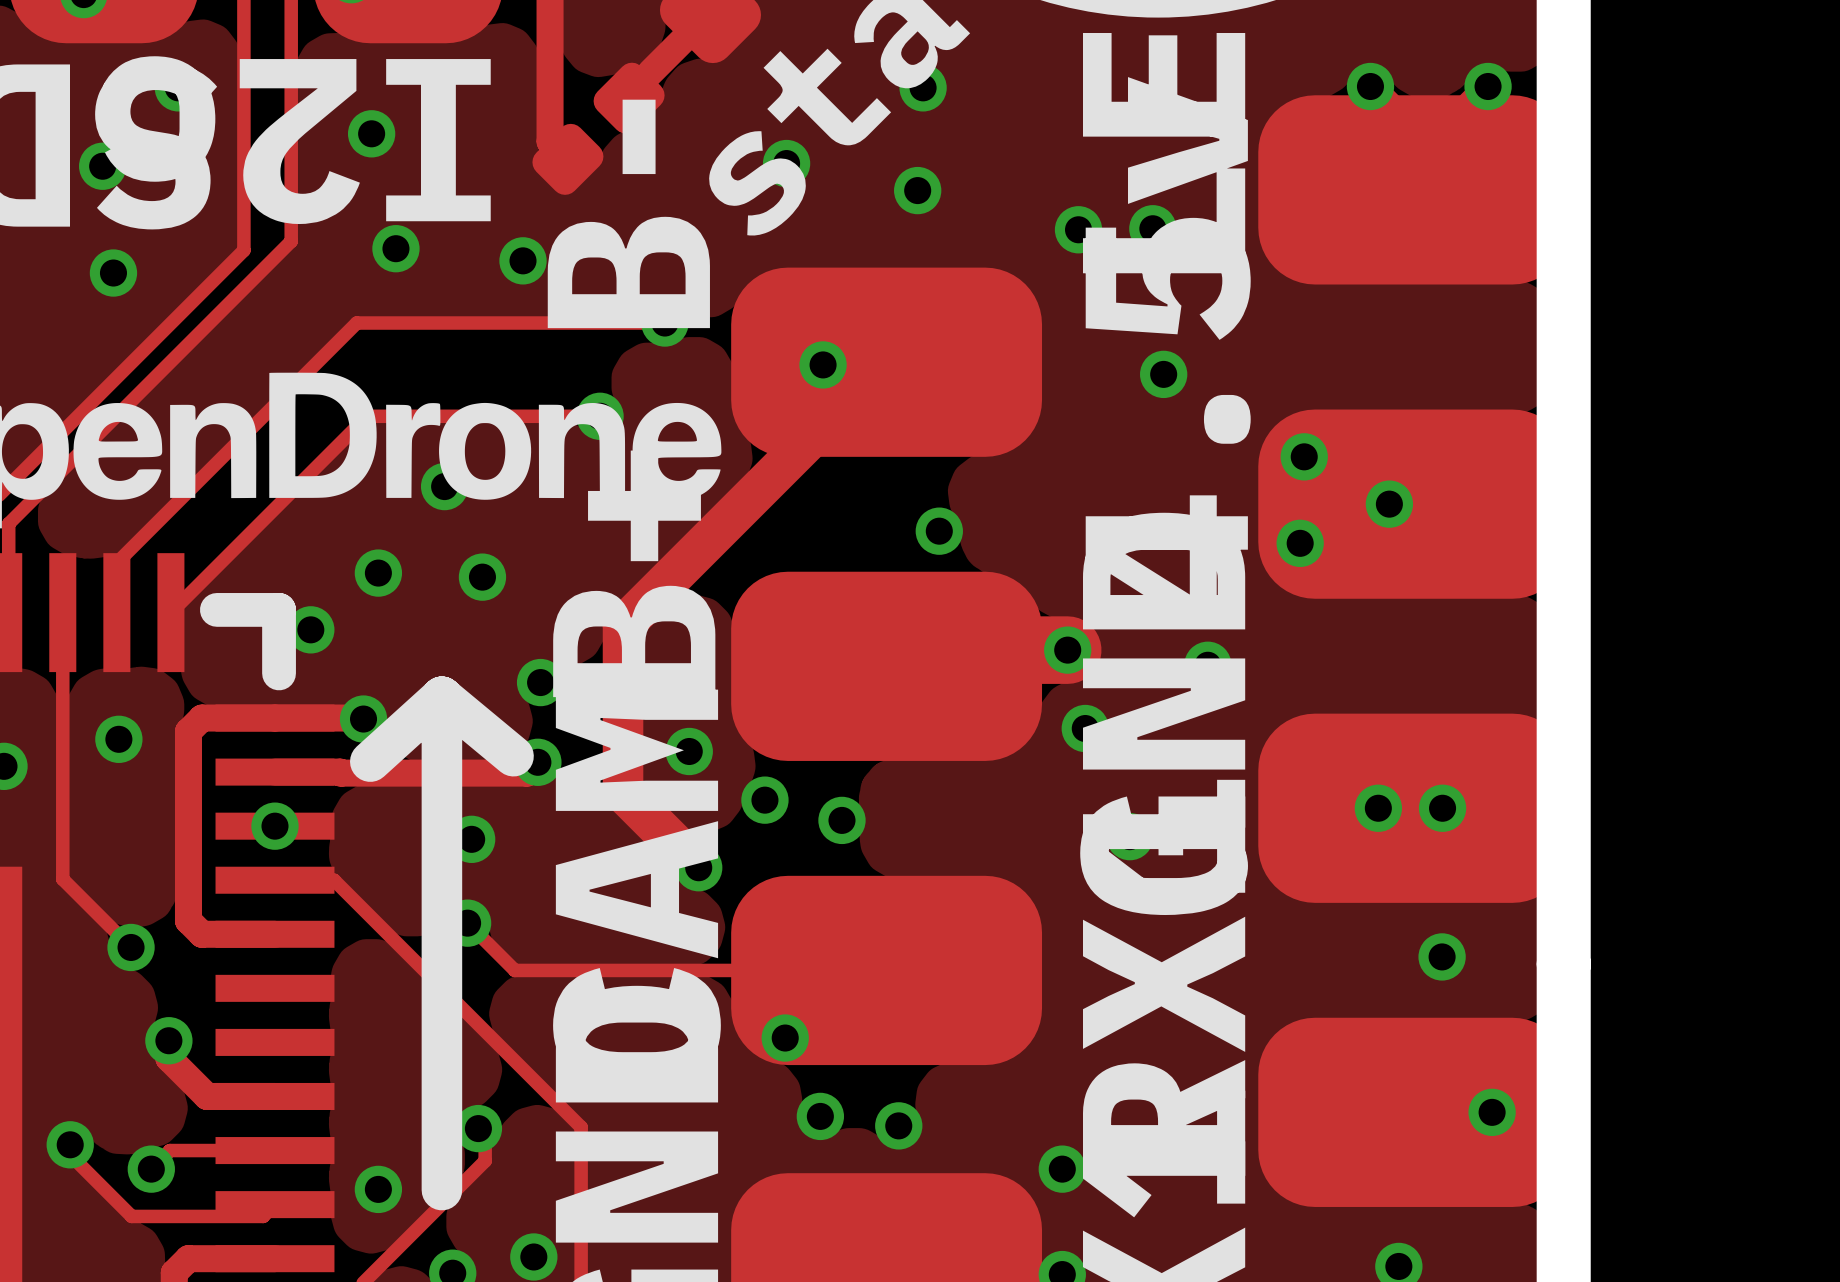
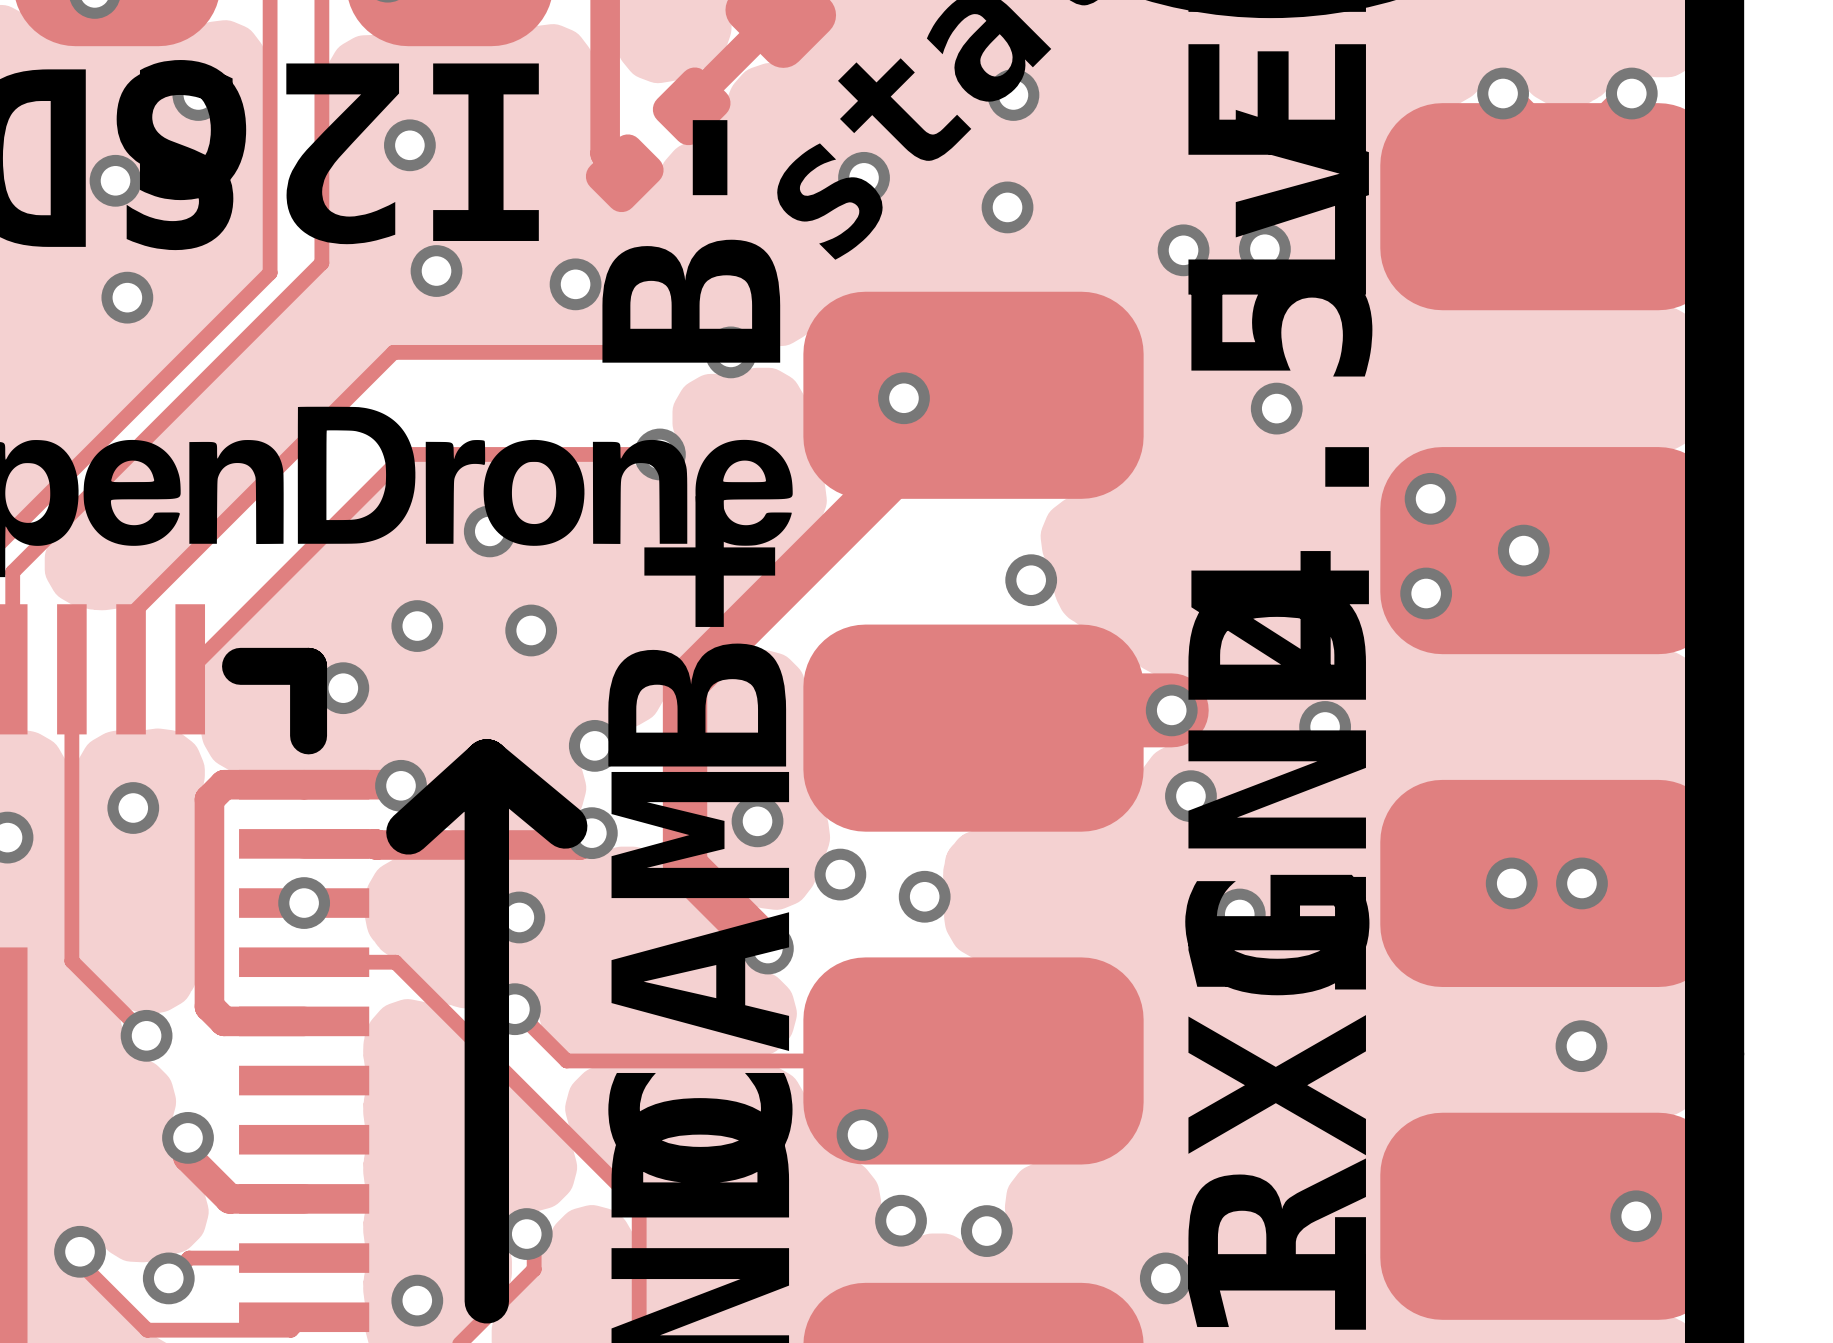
track: (334, 880) (581, 1127) -> (368, 962) (395, 962) (639, 1205) (639, 1232)

